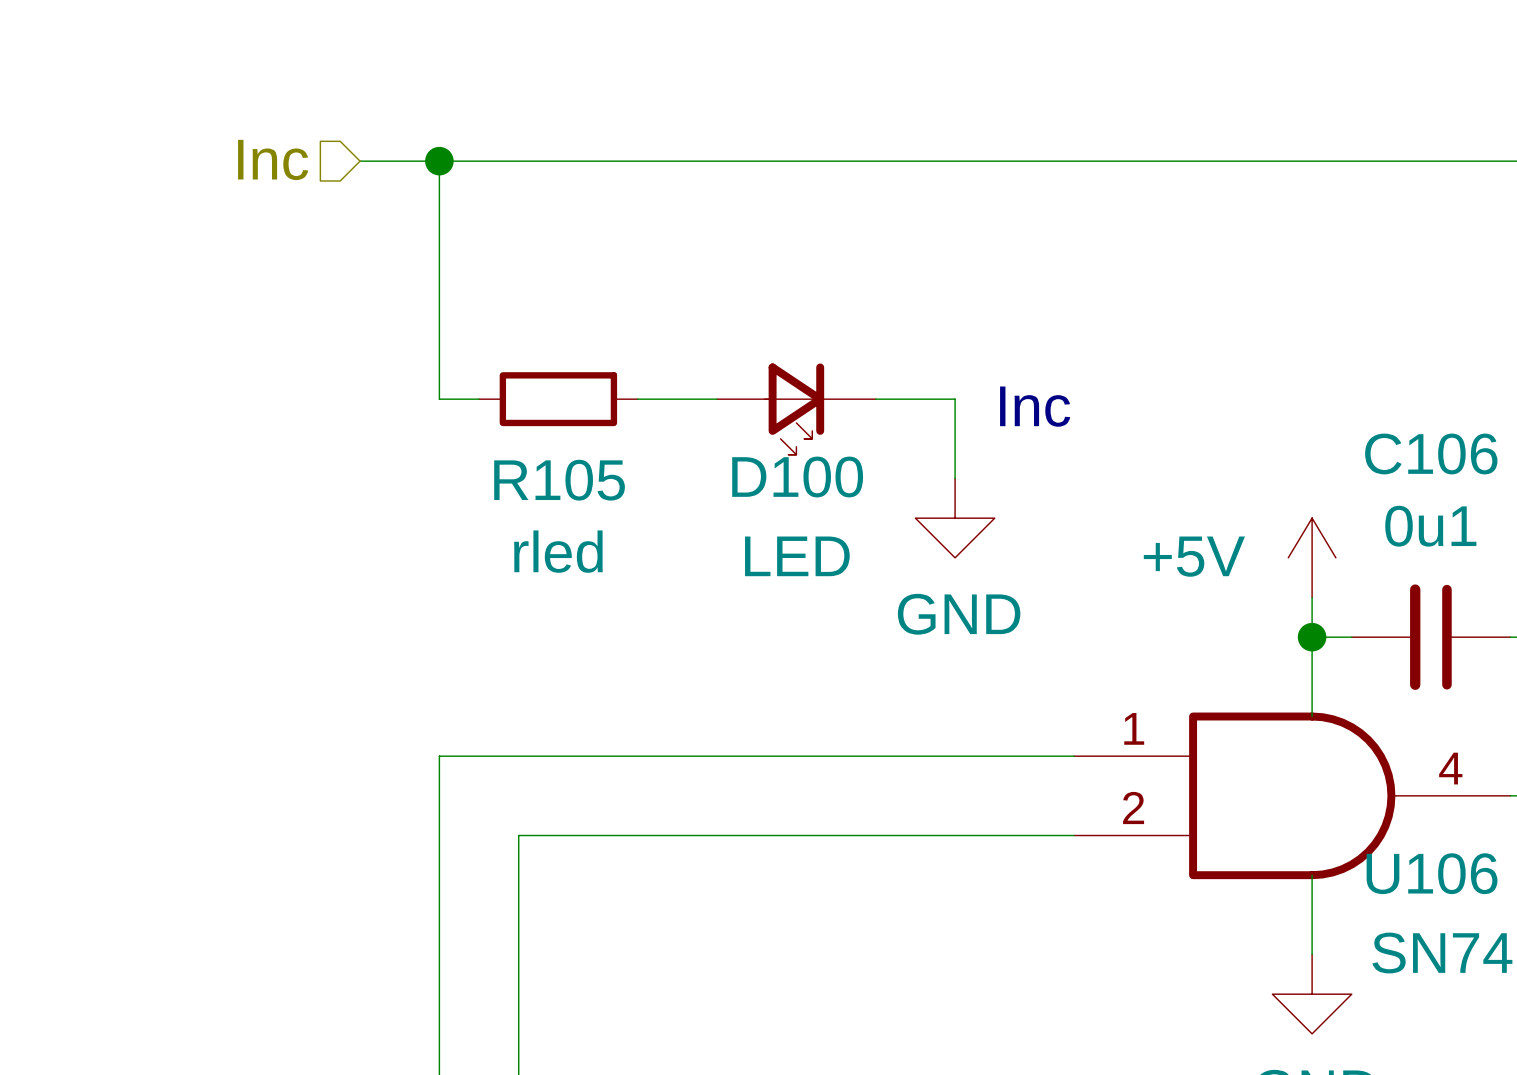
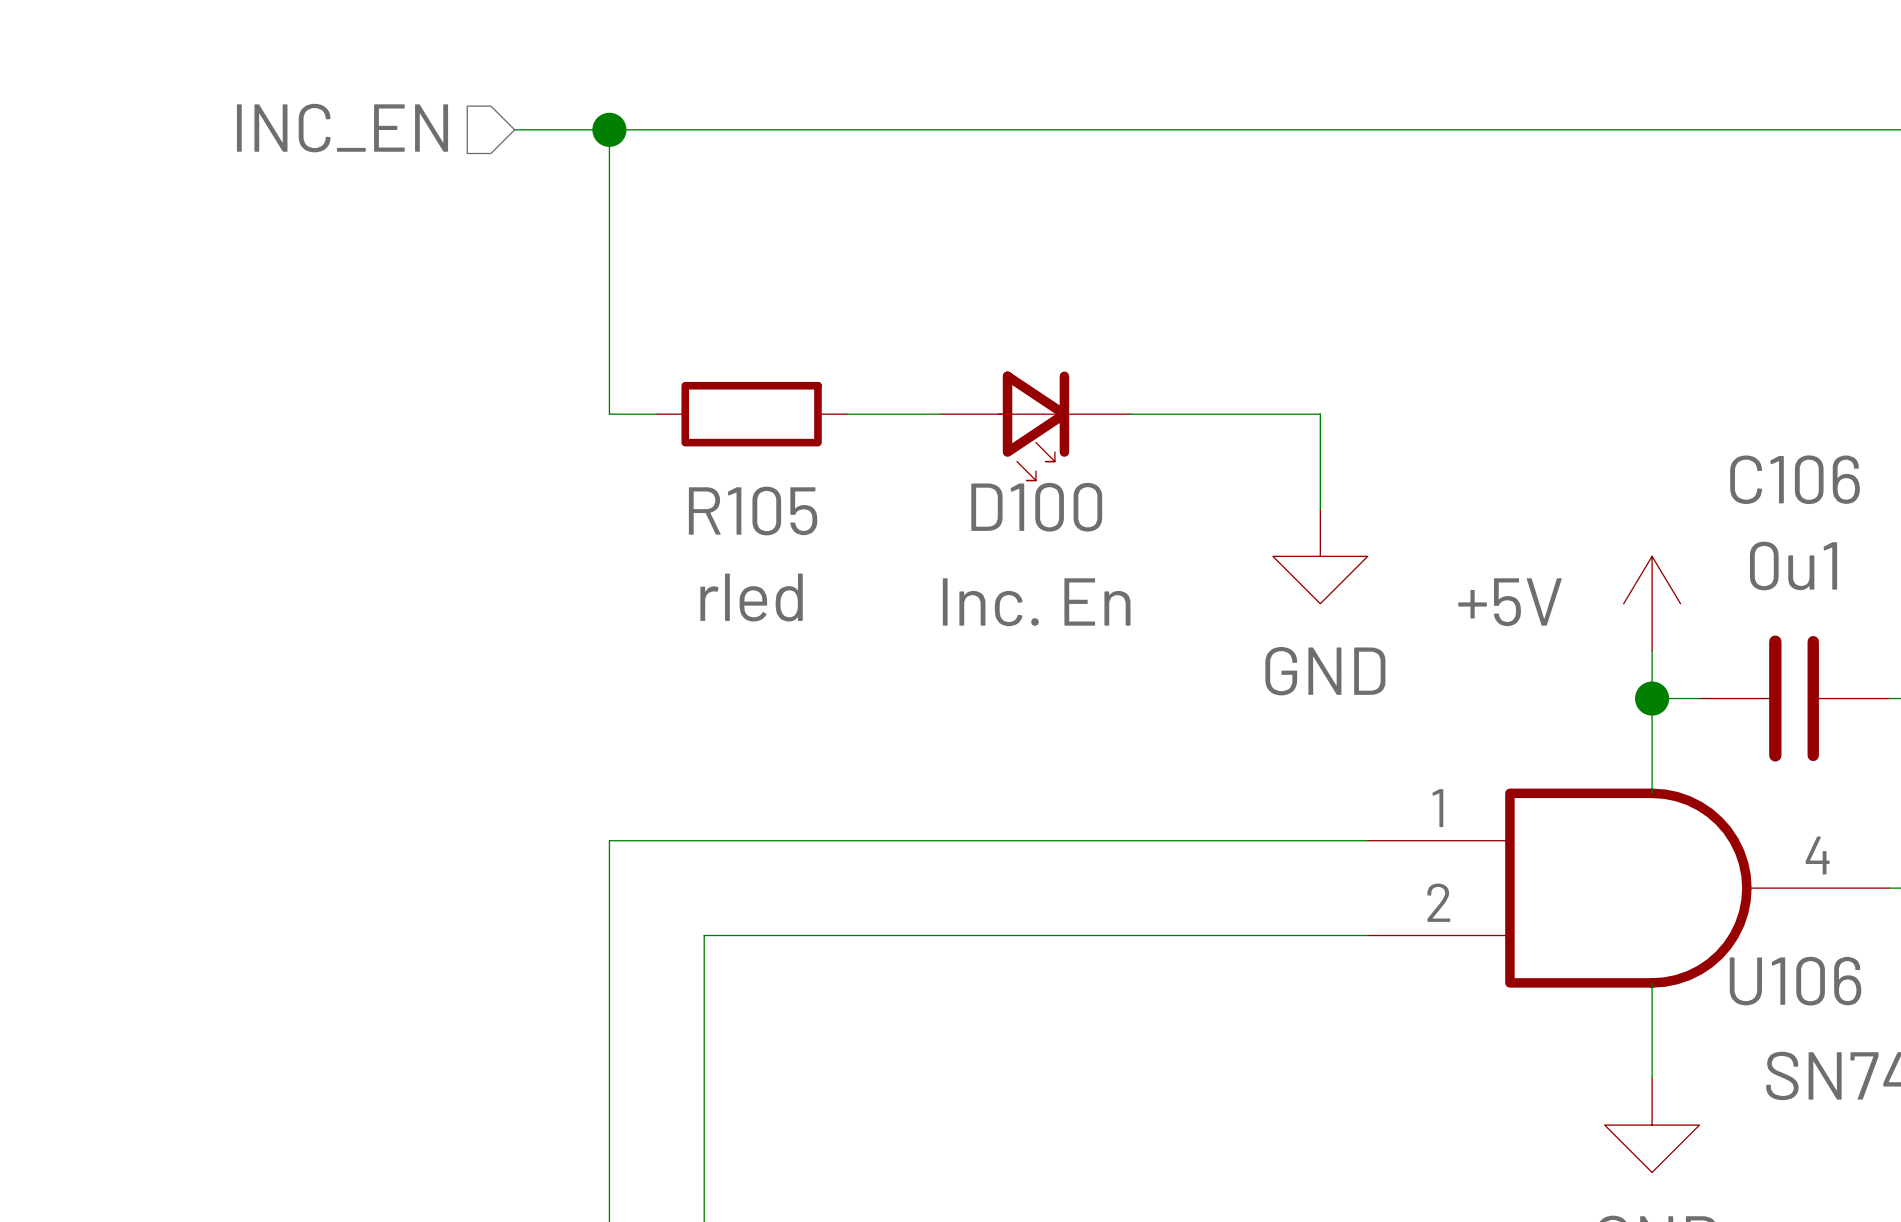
hierarchical label: Inc (273, 159) -> INC_EN (342, 128)
wire: (955, 399) (955, 478) -> (1225, 414) (1320, 414) (1320, 508)
text: Inc (1035, 406) -> none
power symbol position: GND (955, 518) -> GND (1320, 556)
D100 value: LED (797, 556) -> Inc. En (1036, 602)

